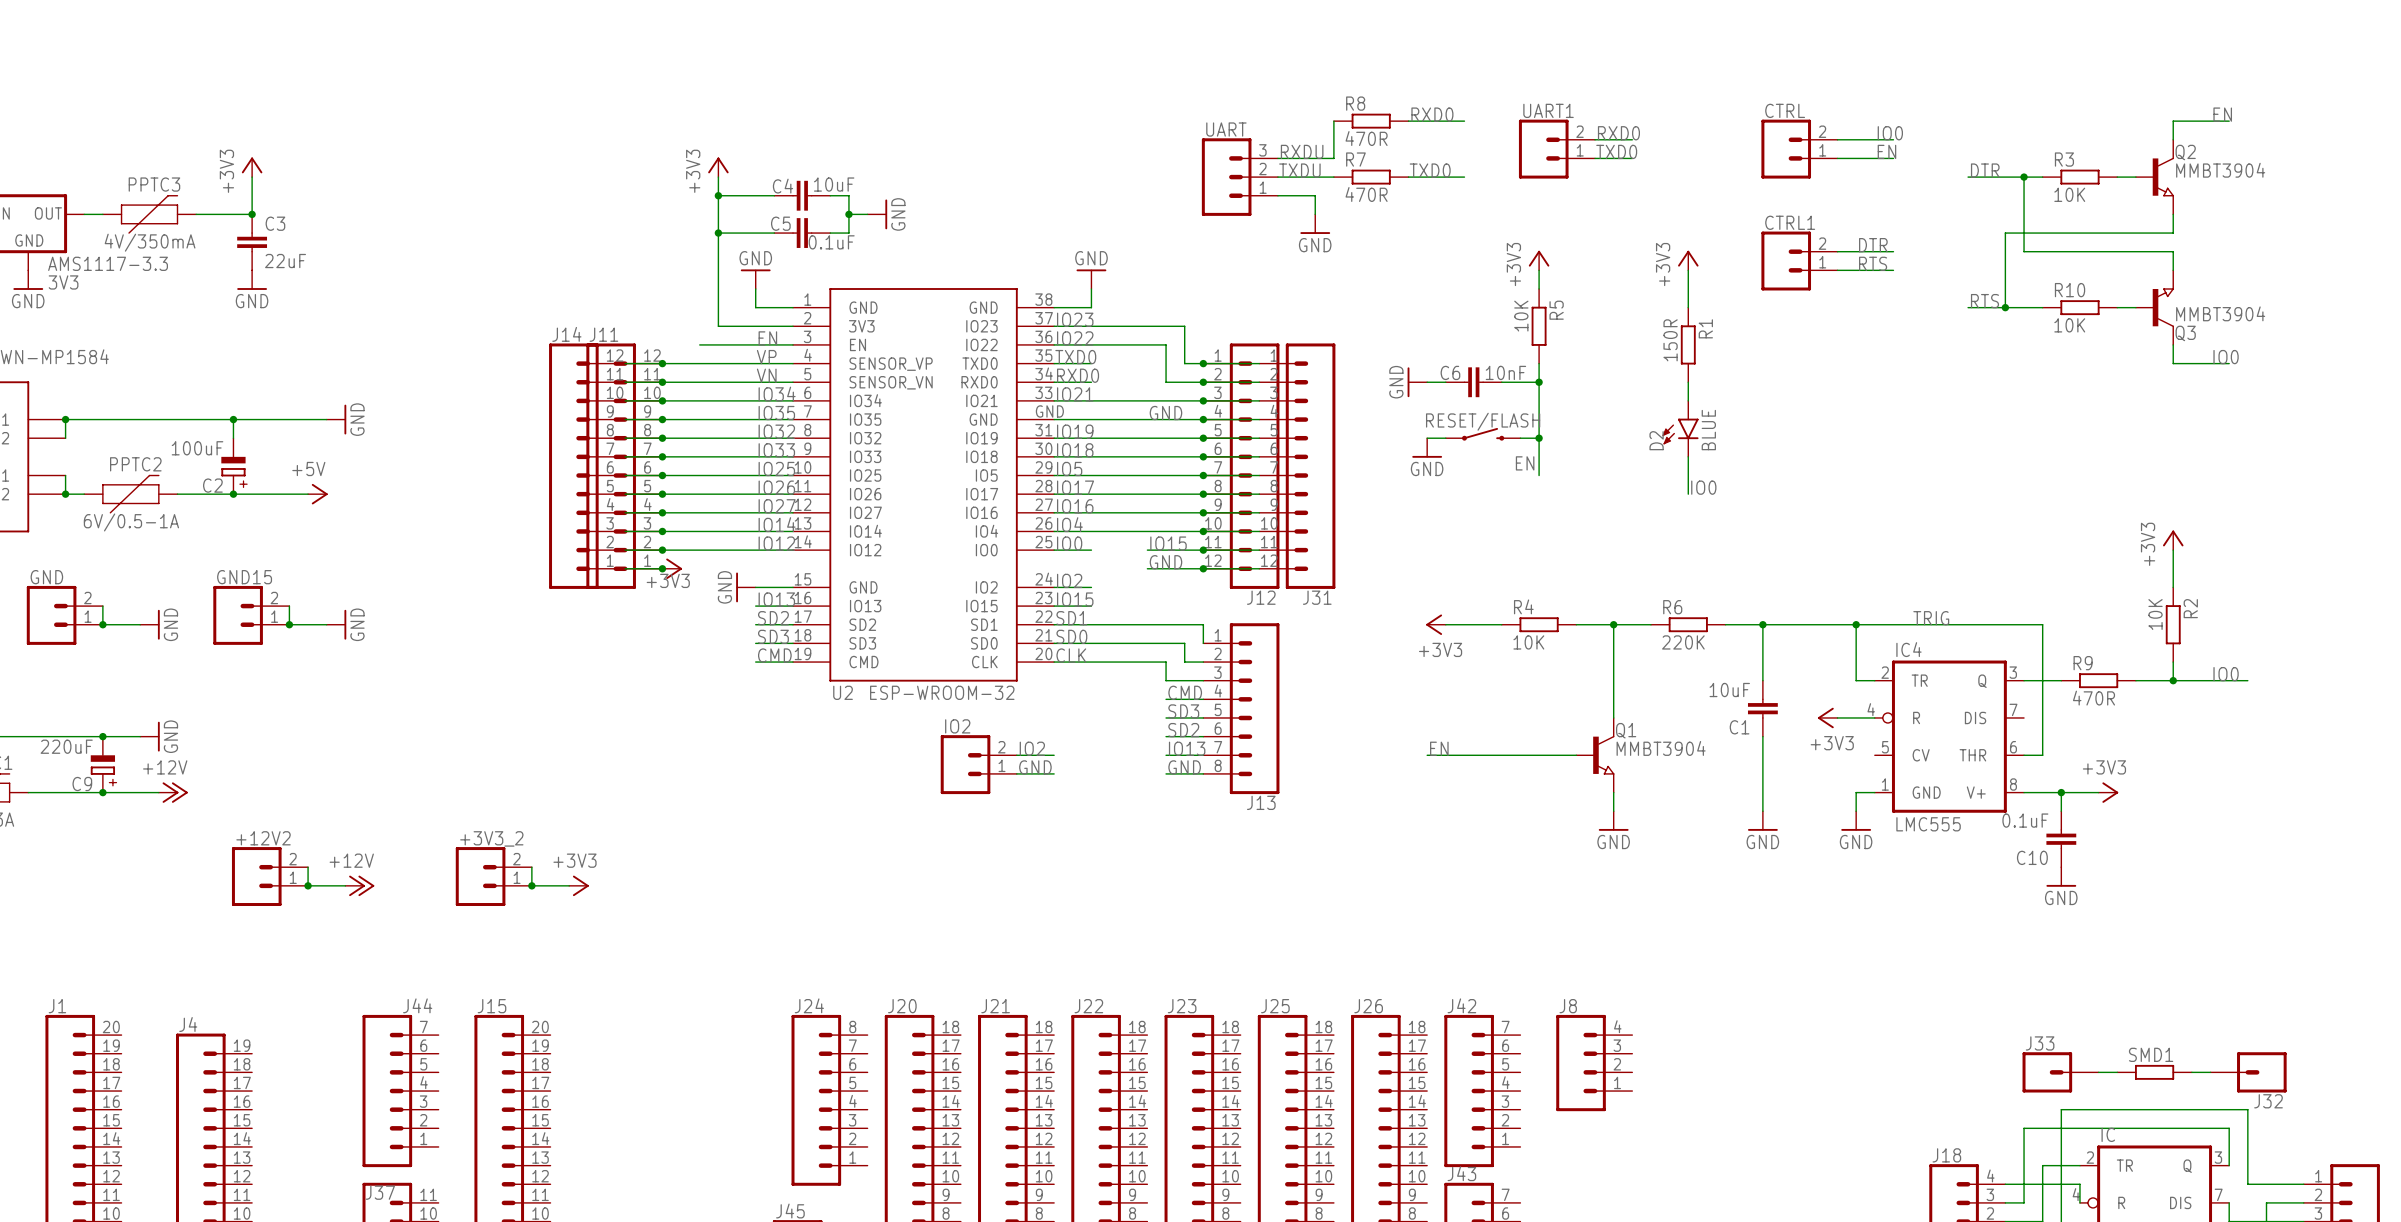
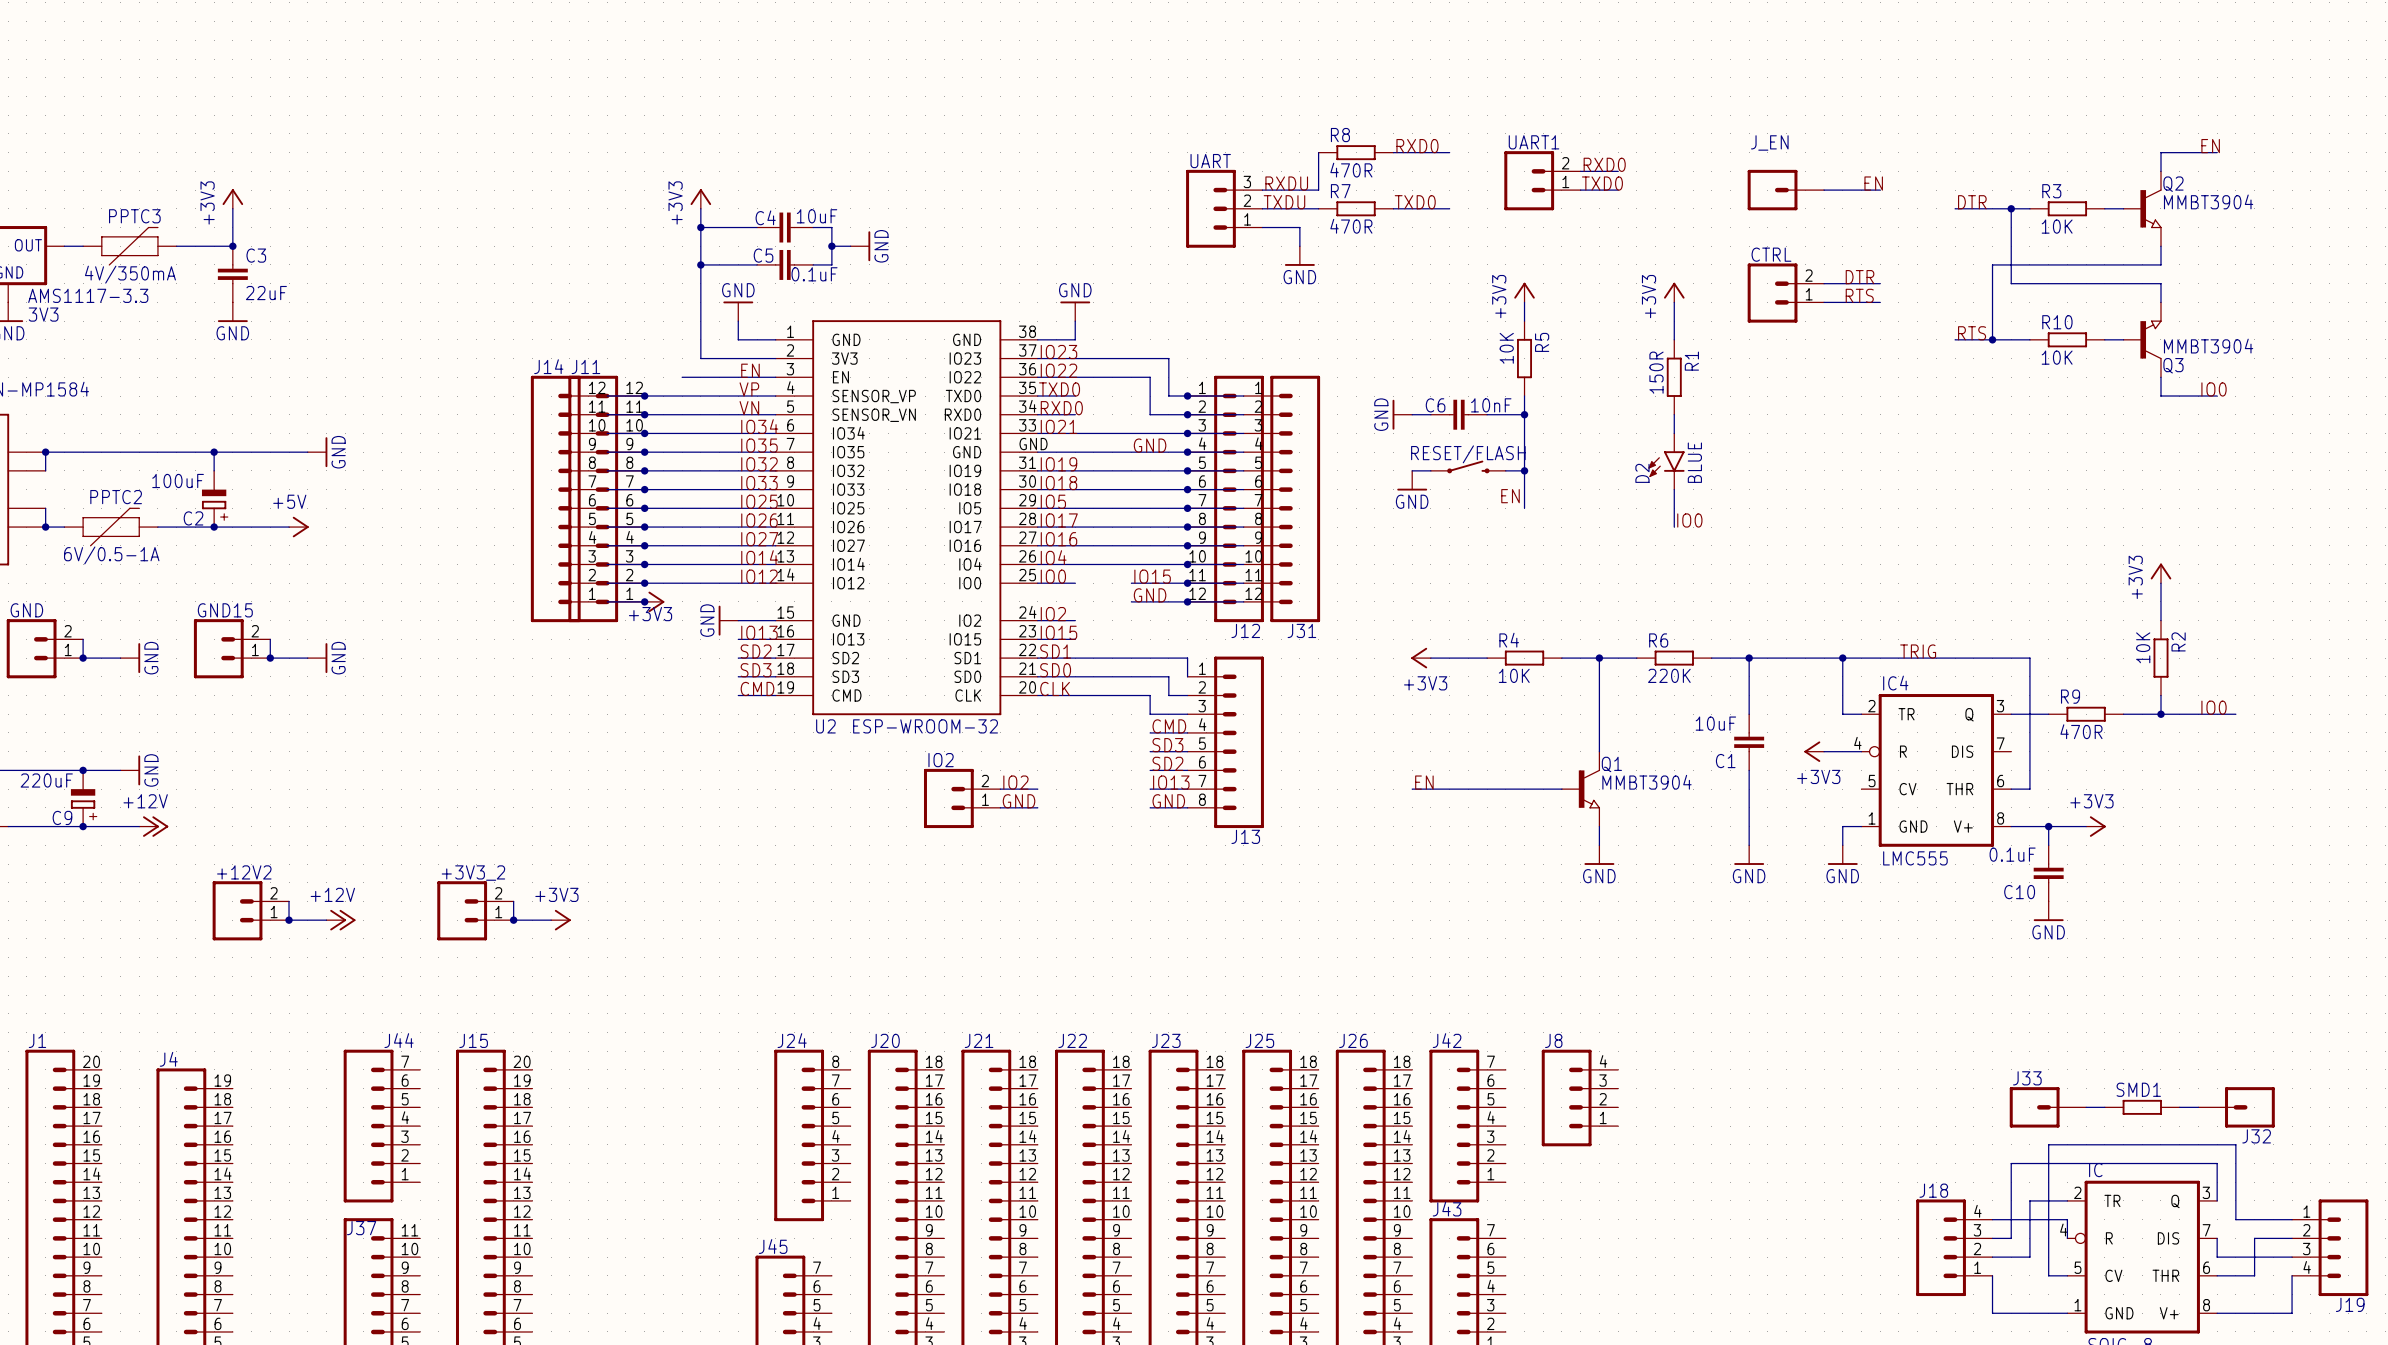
label: IO0 (1890, 133) -> none
wire: (1837, 139) (1893, 139) -> none
CTRL: (1799, 149) -> none
J_EN: none -> (1785, 190)
CTRL1 name: CTRL1 (1790, 222) -> CTRL (1771, 254)

